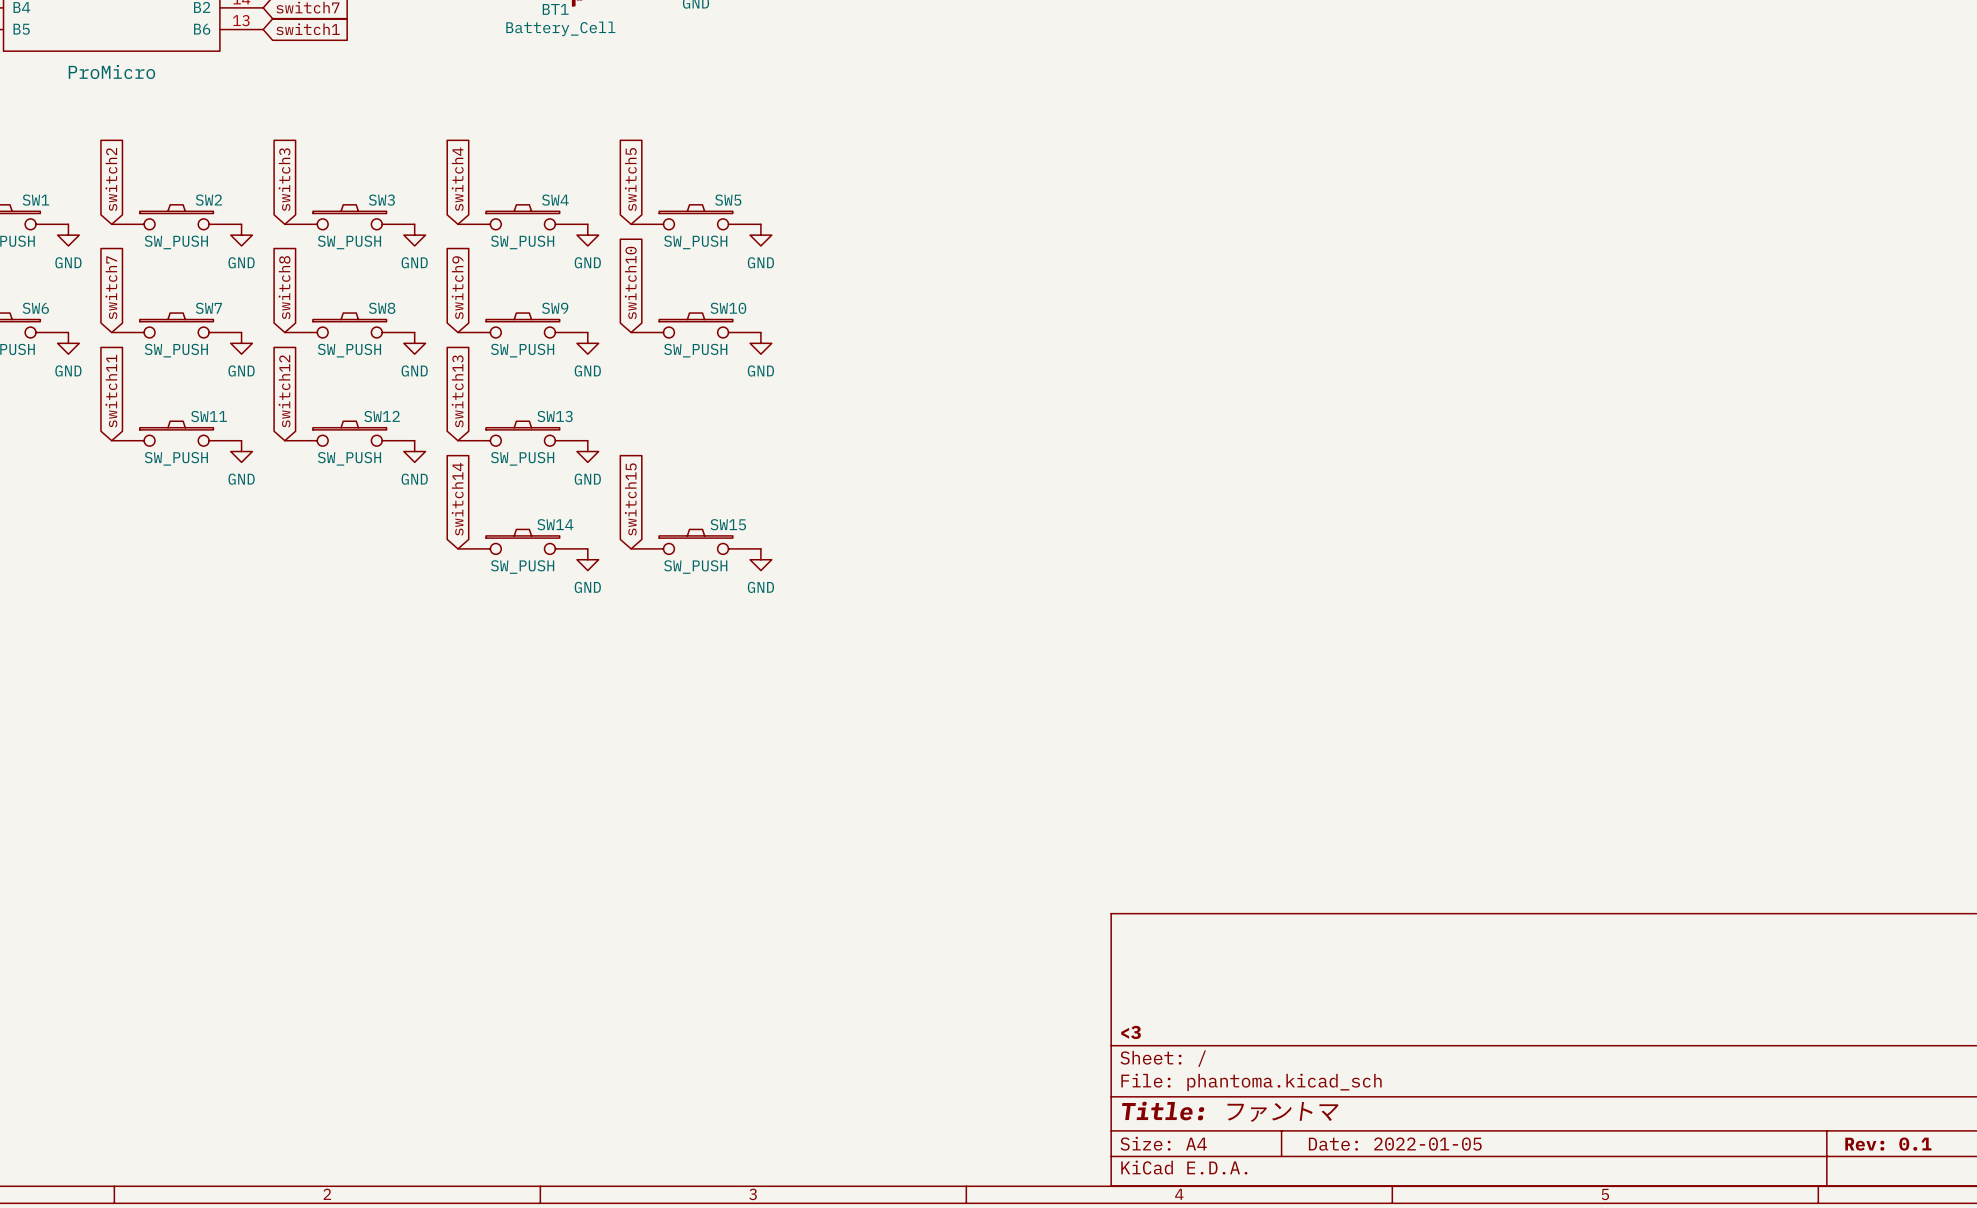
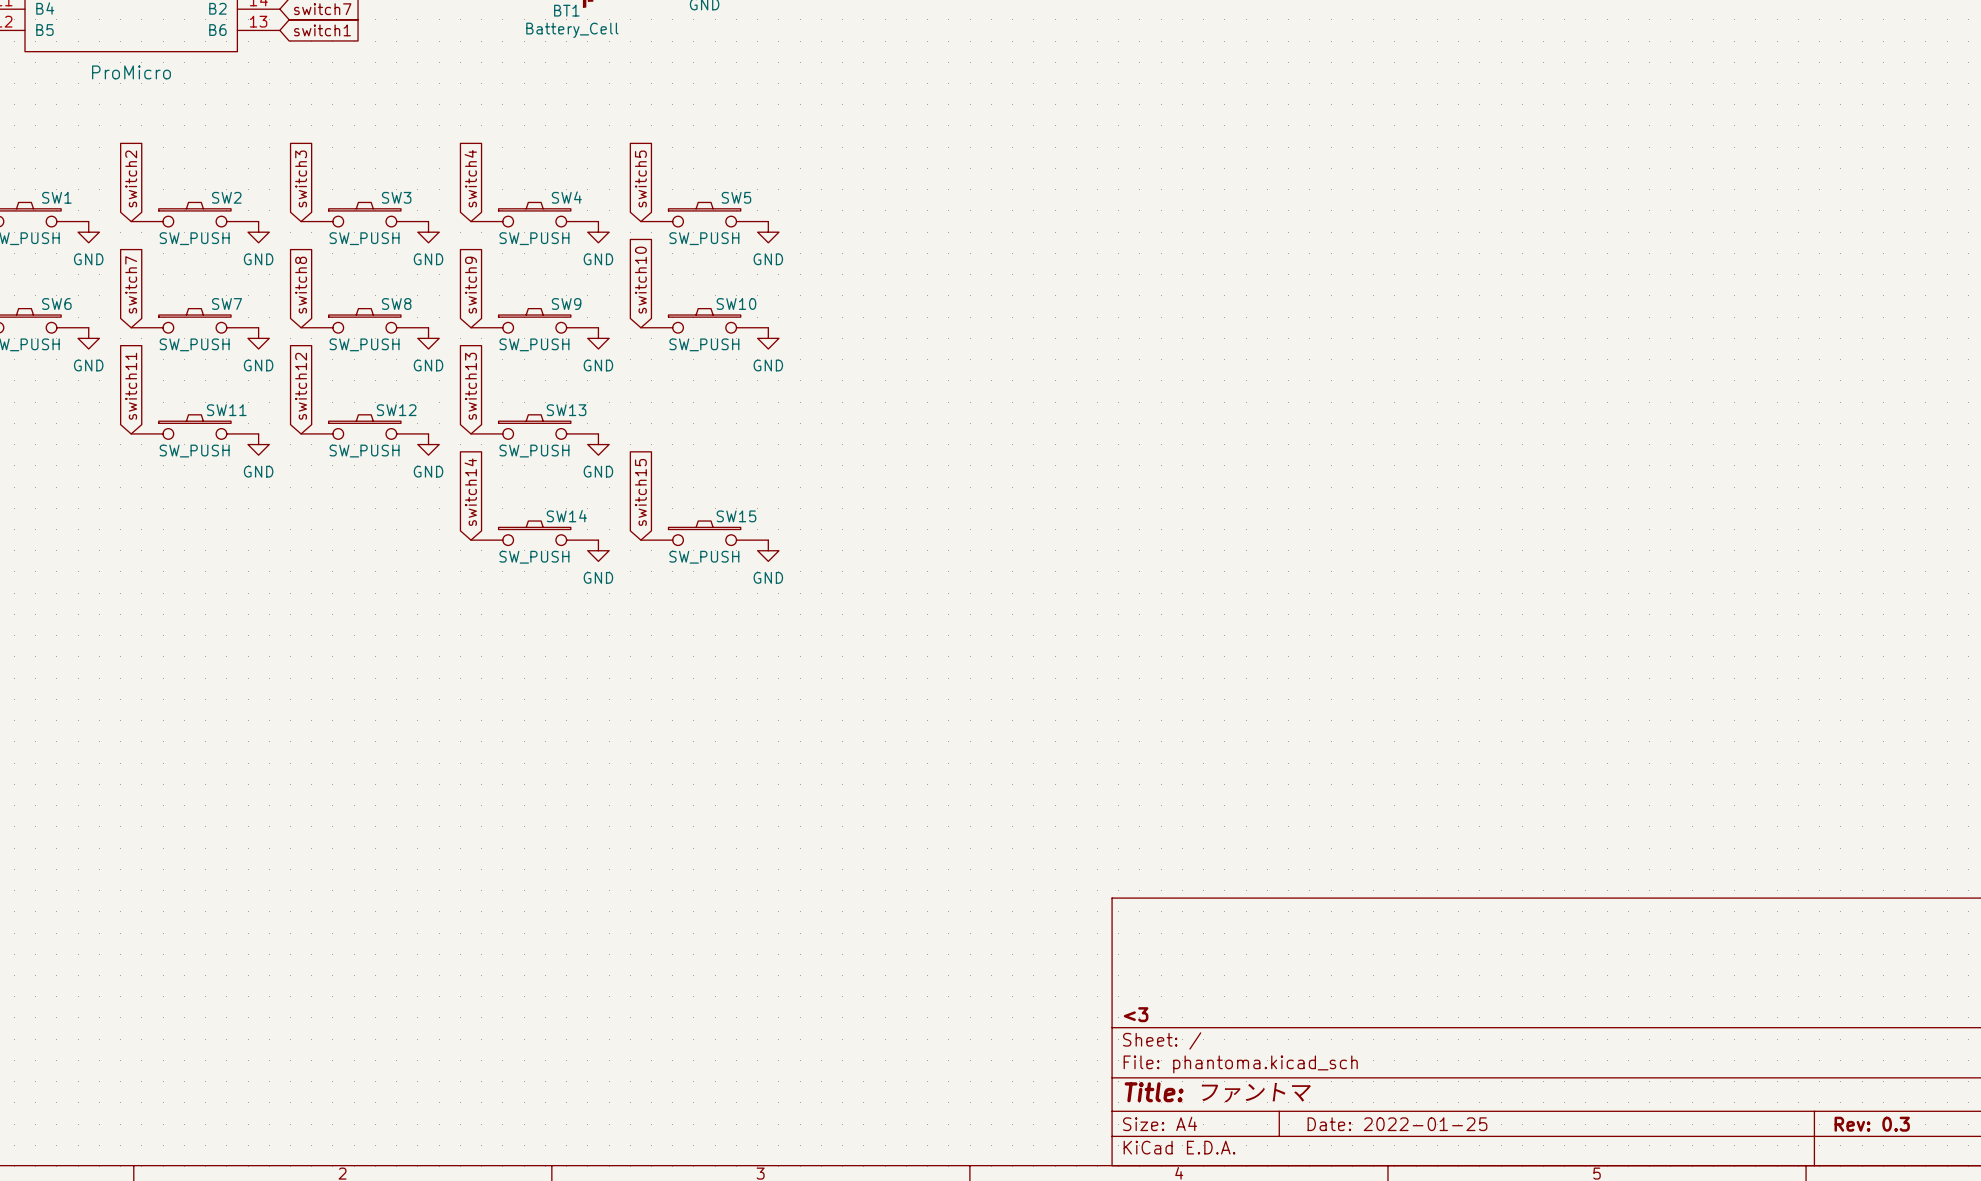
title block: Date: 2022-01-05 (1395, 1144) -> Date: 2022-01-25 (1397, 1124)
title block: Rev: 0.1 (1888, 1144) -> Rev: 0.3 (1872, 1124)

